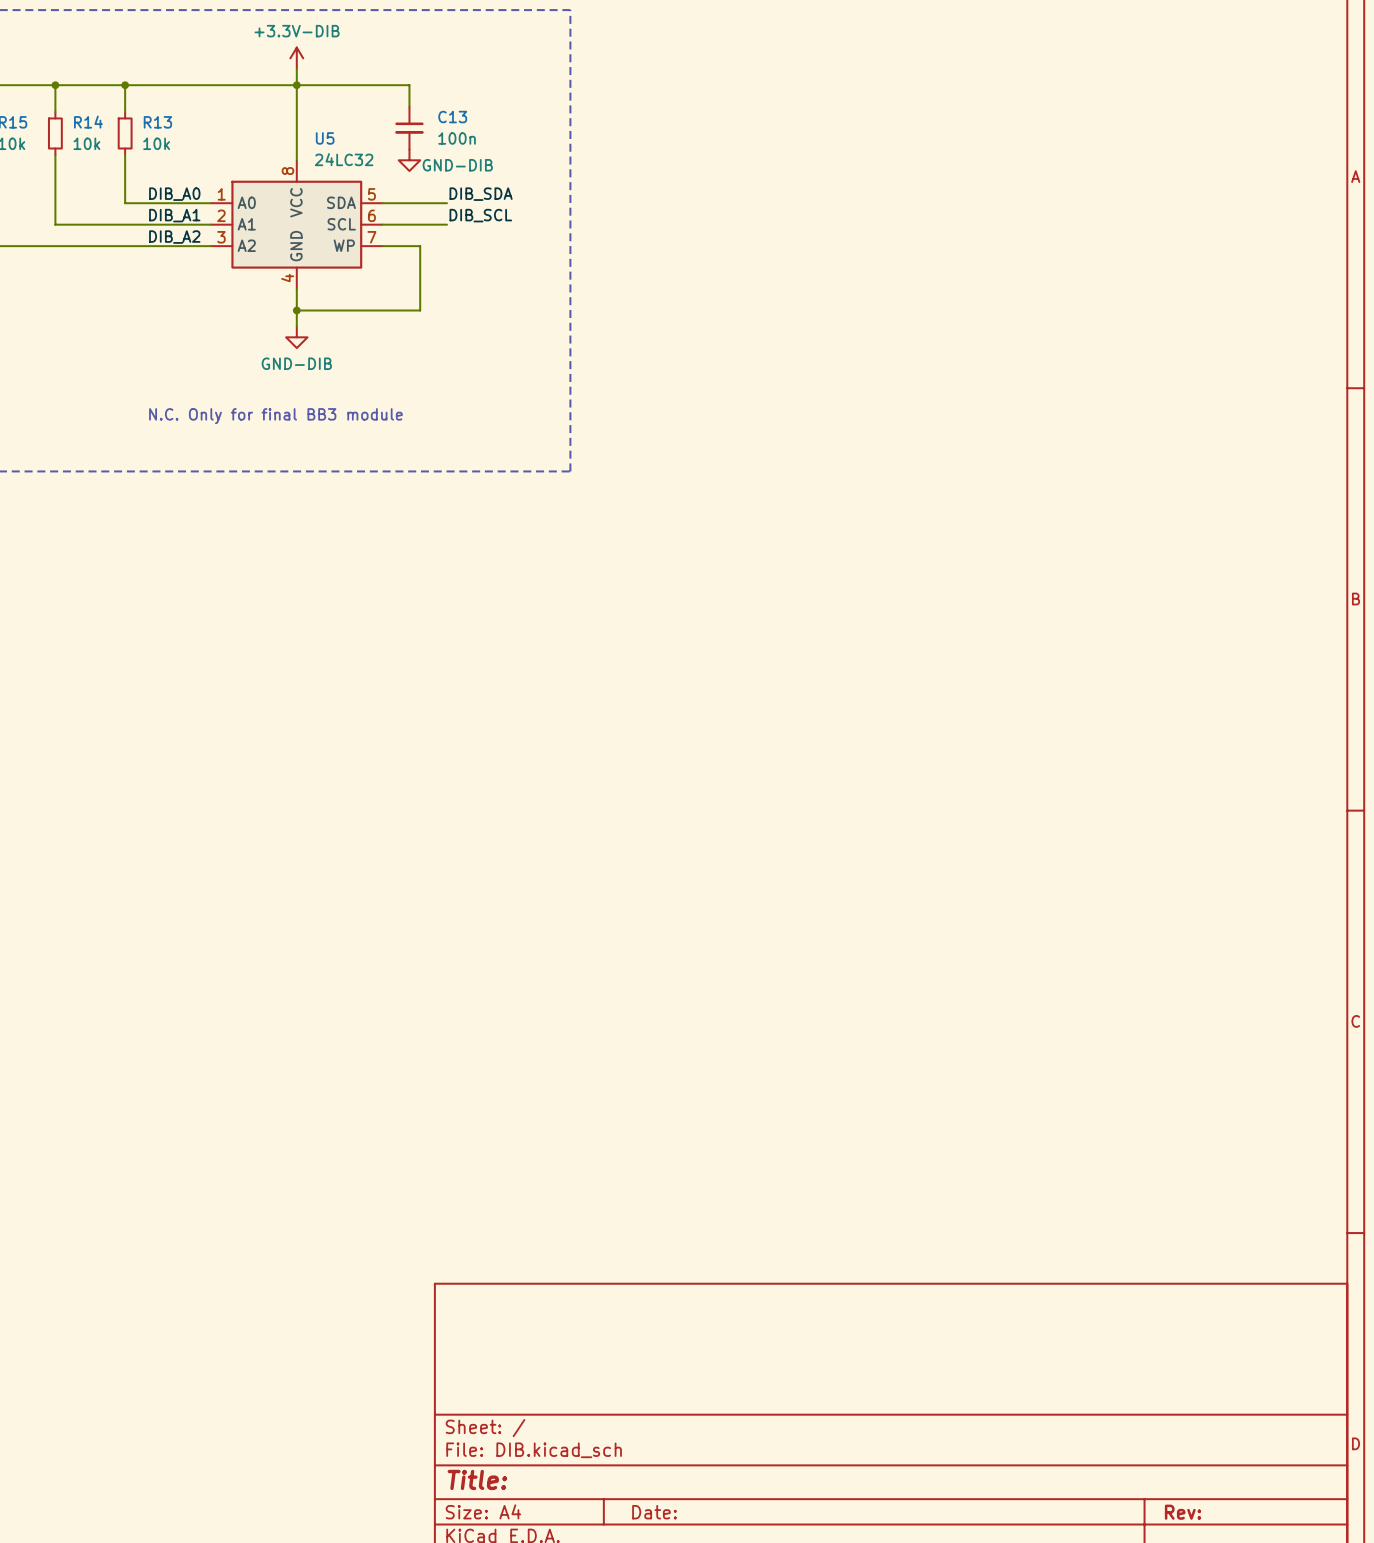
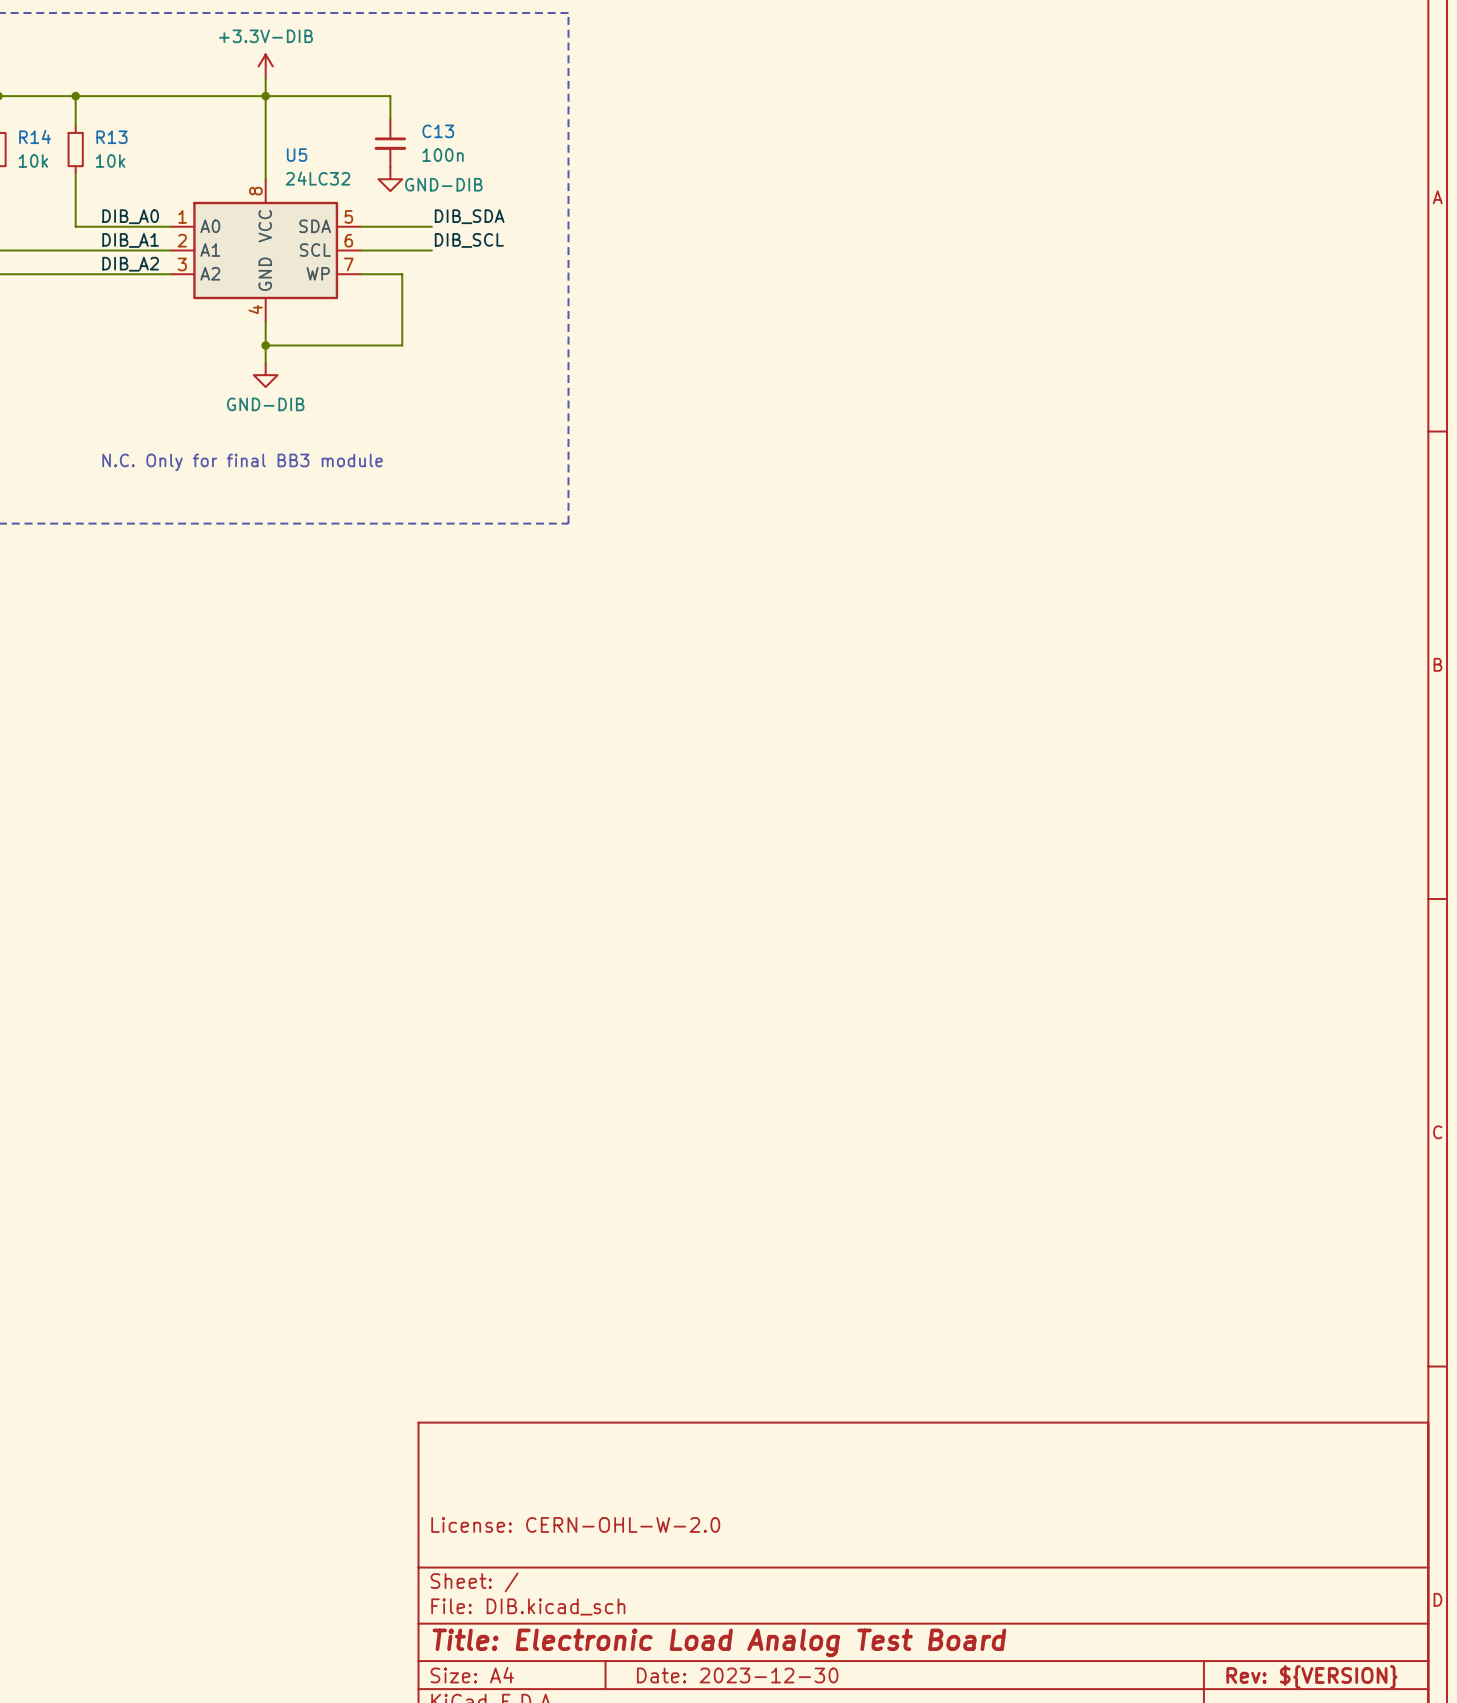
title block: none -> License: CERN-OHL-W-2.0 (575, 1524)
title block: Title: (477, 1479) -> Title: Electronic Load Analog Test Board (719, 1642)
title block: Date: (654, 1512) -> Date: 2023-12-30 (737, 1675)
title block: Rev: (1183, 1512) -> Rev: ${VERSION} (1311, 1677)

